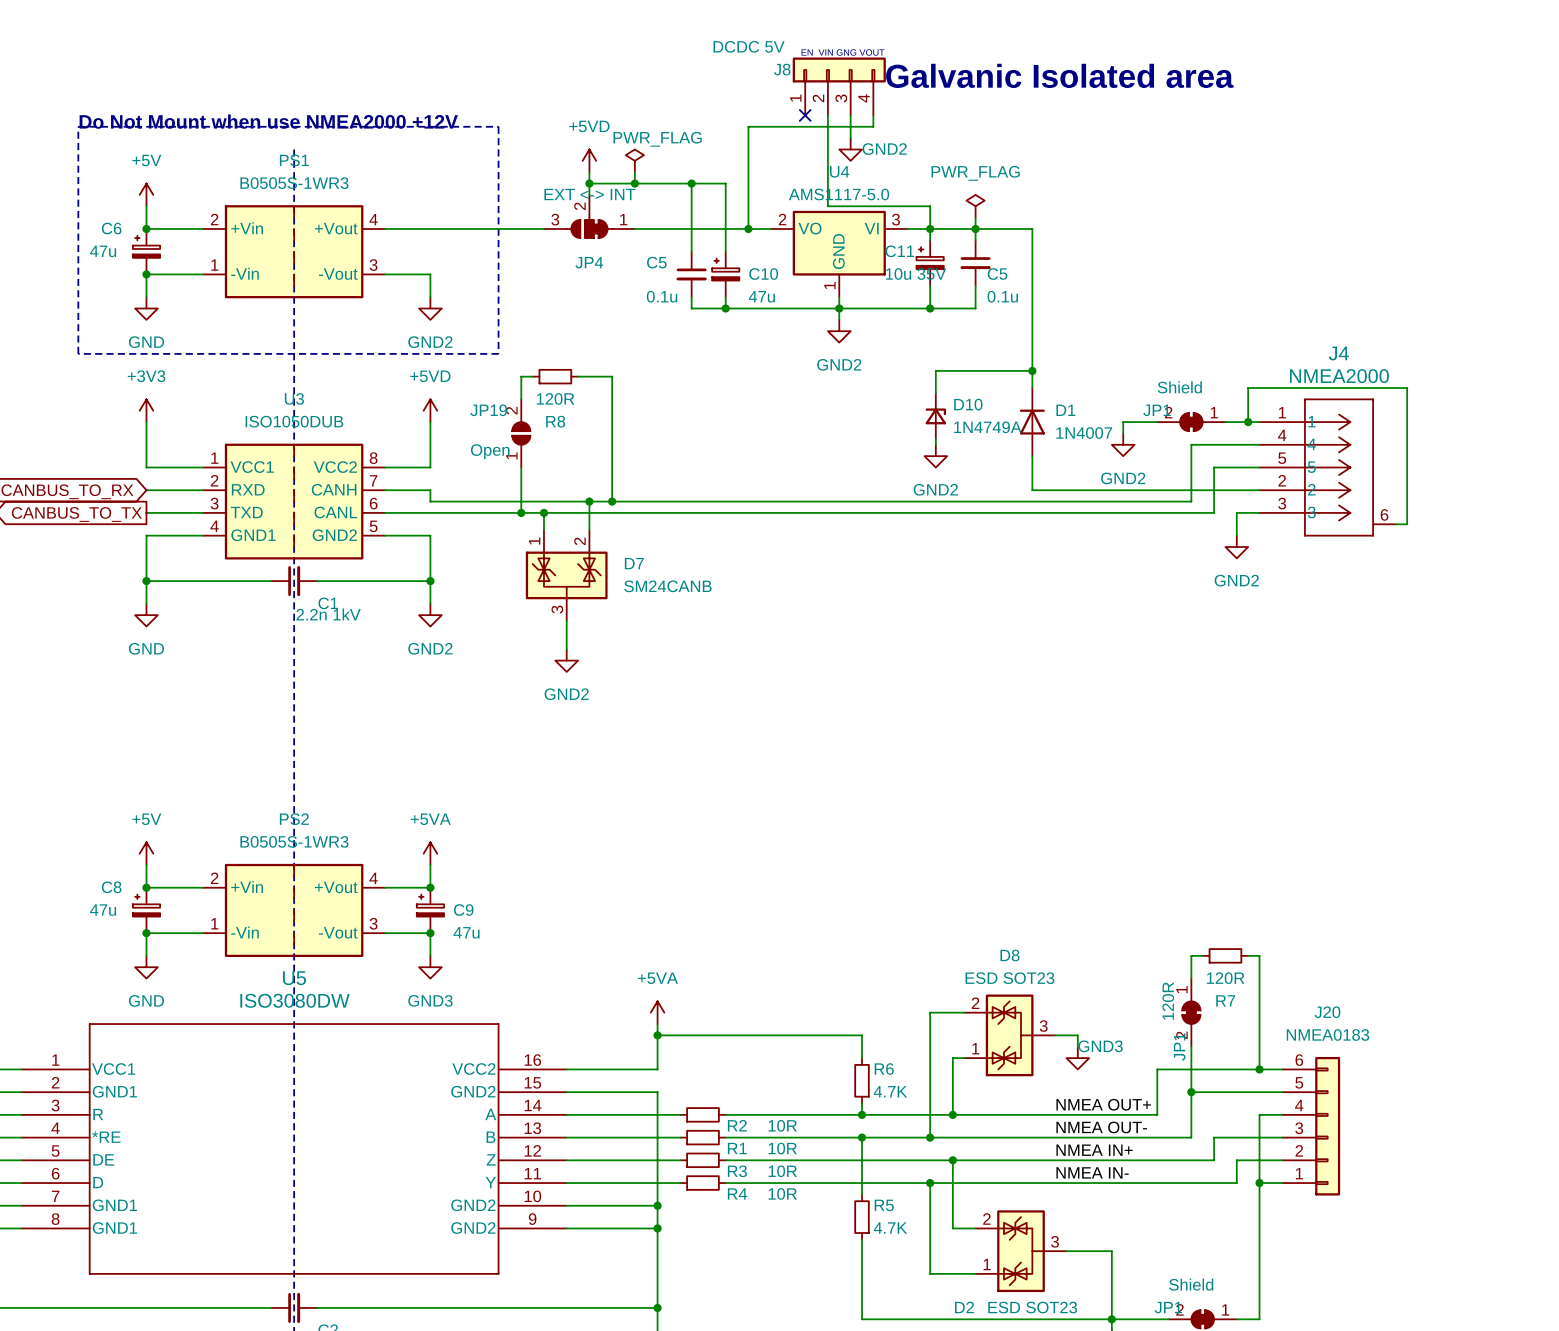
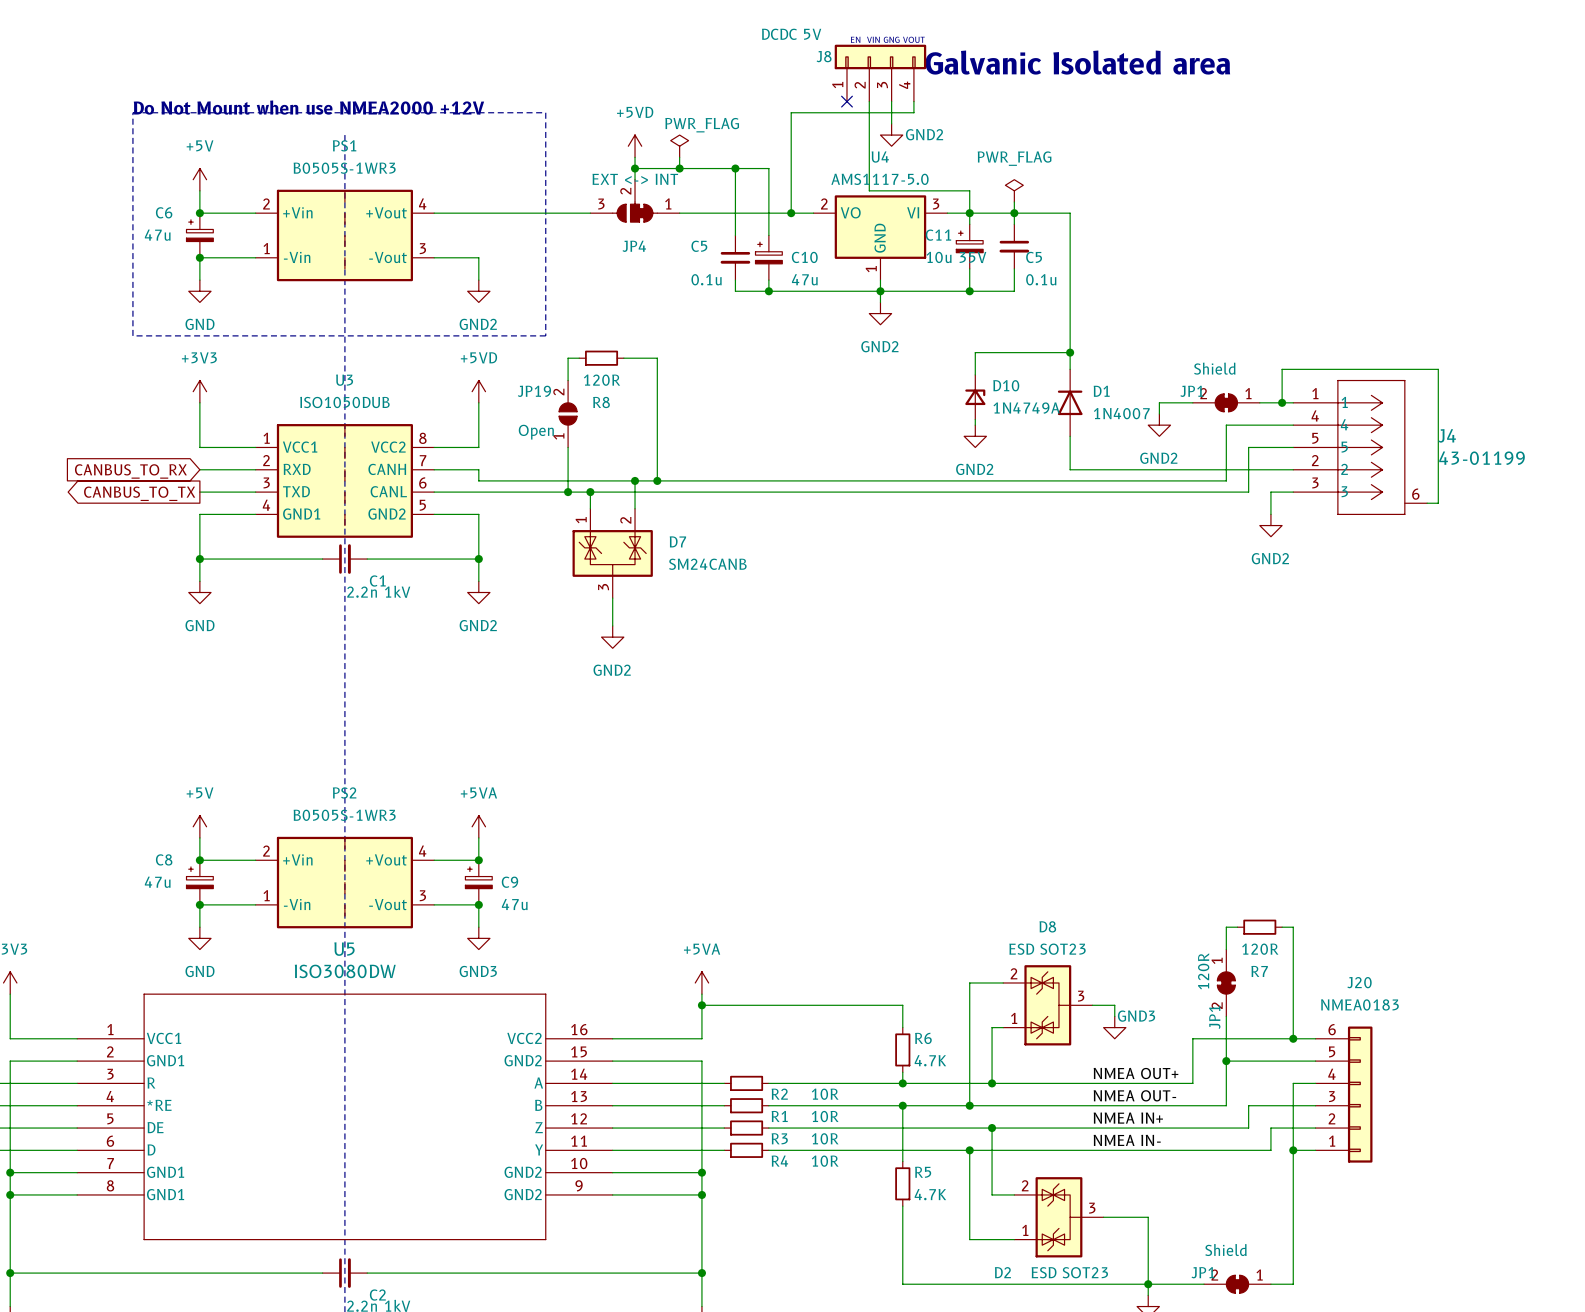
J4 name position: J4 (1338, 353) -> J4 (1447, 435)
J4 value: NMEA2000 (1339, 376) -> 43-01199 (1482, 458)

